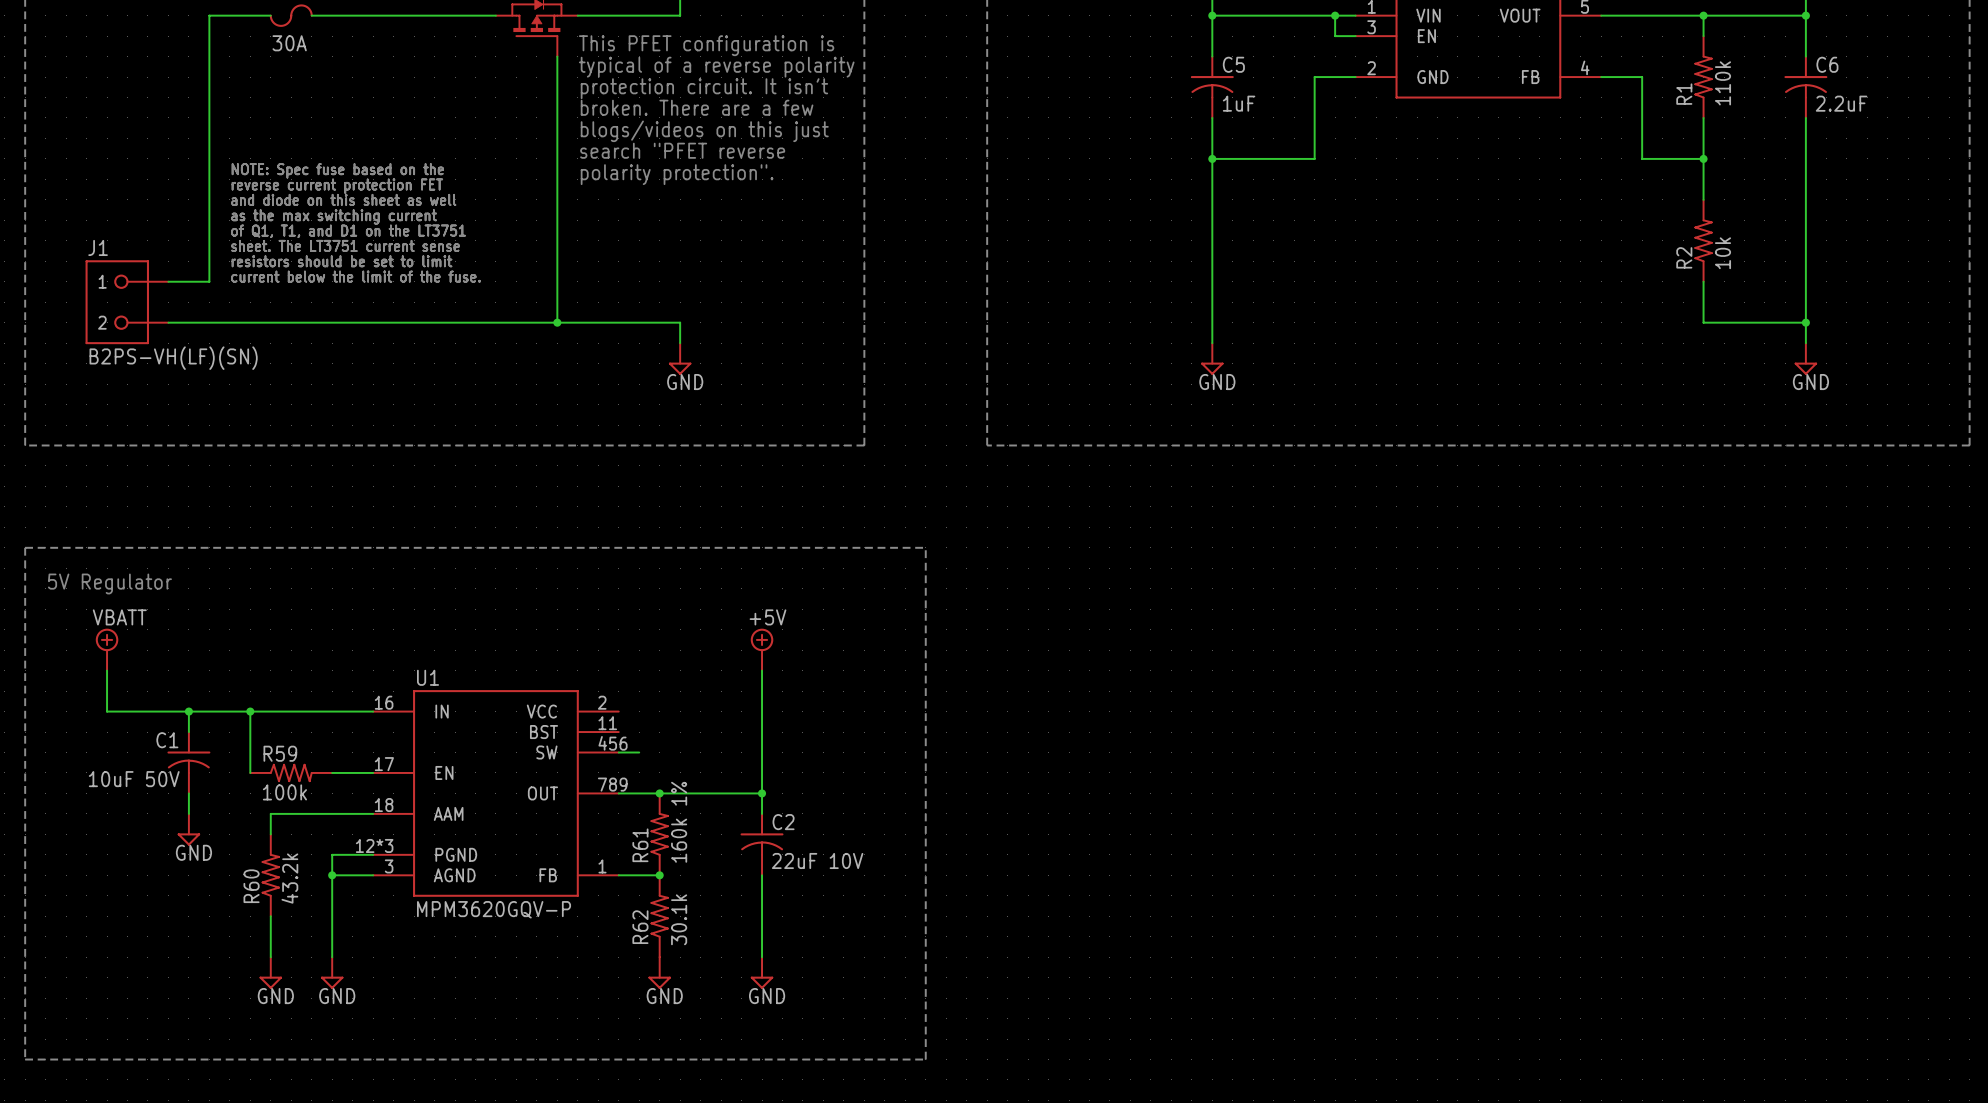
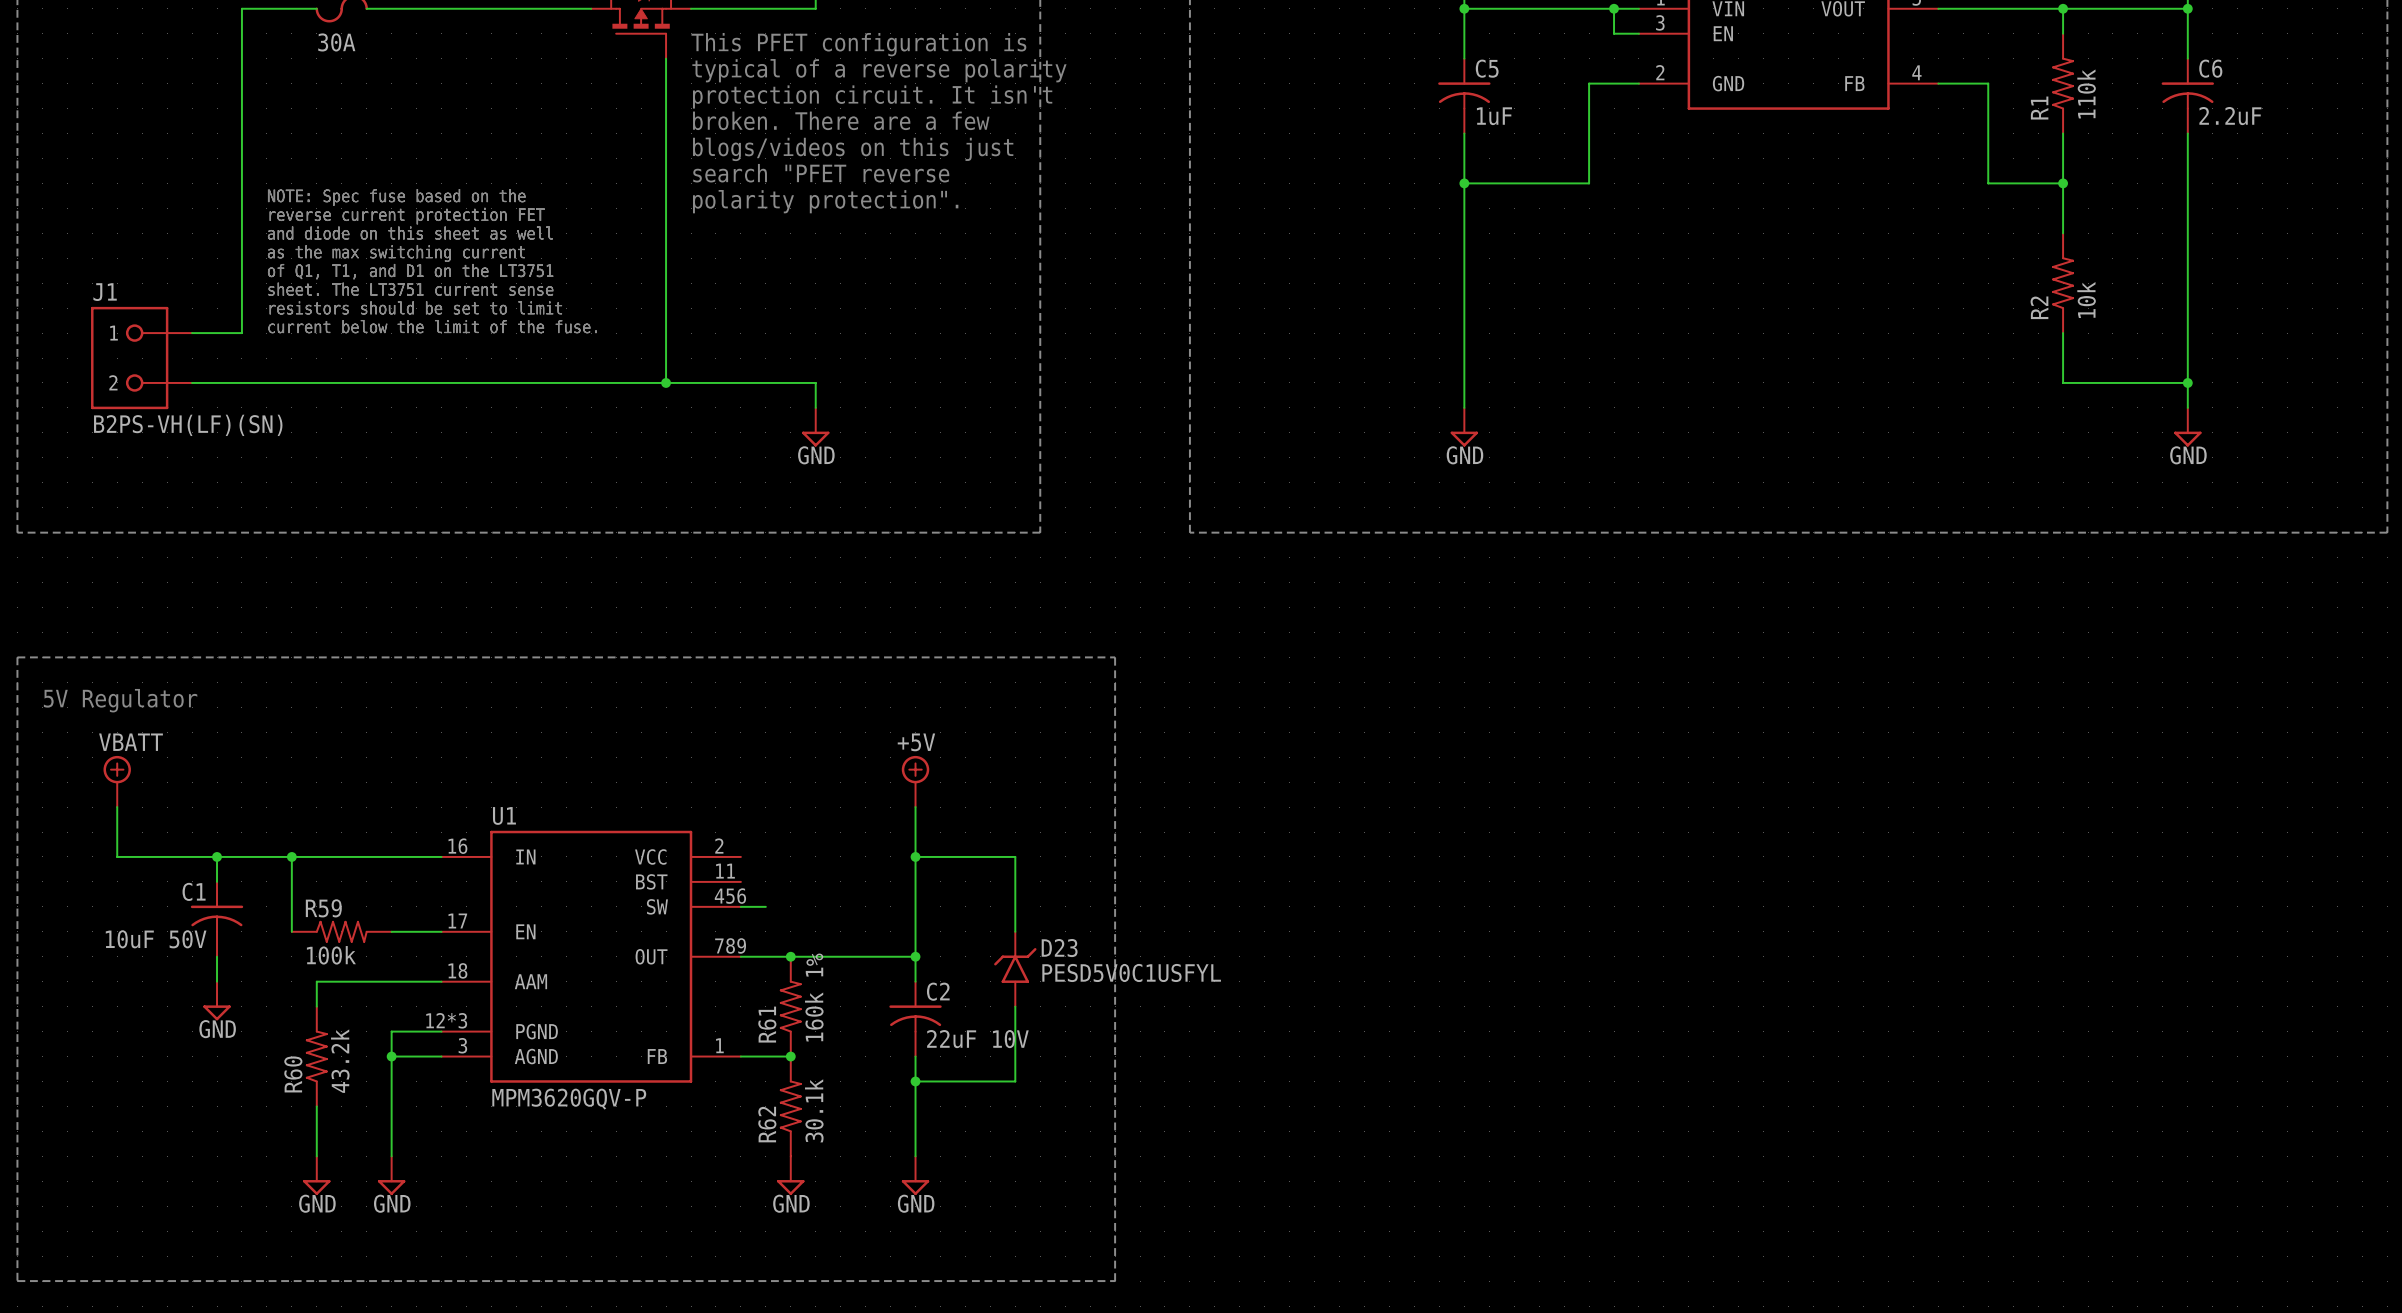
wire: none -> (915, 856) (1015, 856) (1015, 931)
junction: none -> (915, 856)
D23: none -> PESD5V0C1USFYL (1015, 969)
wire: none -> (1015, 1006) (1015, 1081) (915, 1081)
junction: none -> (915, 1081)

